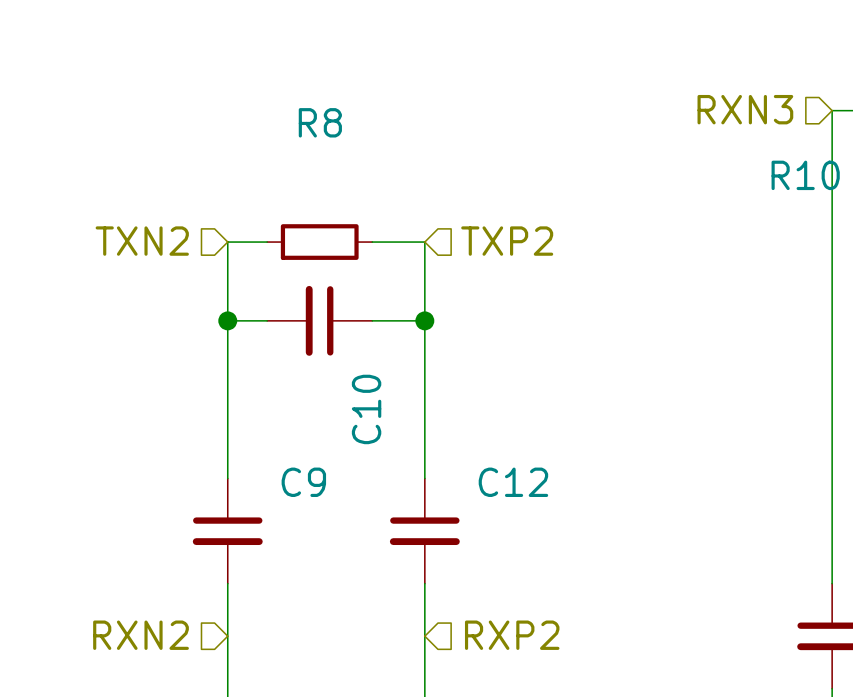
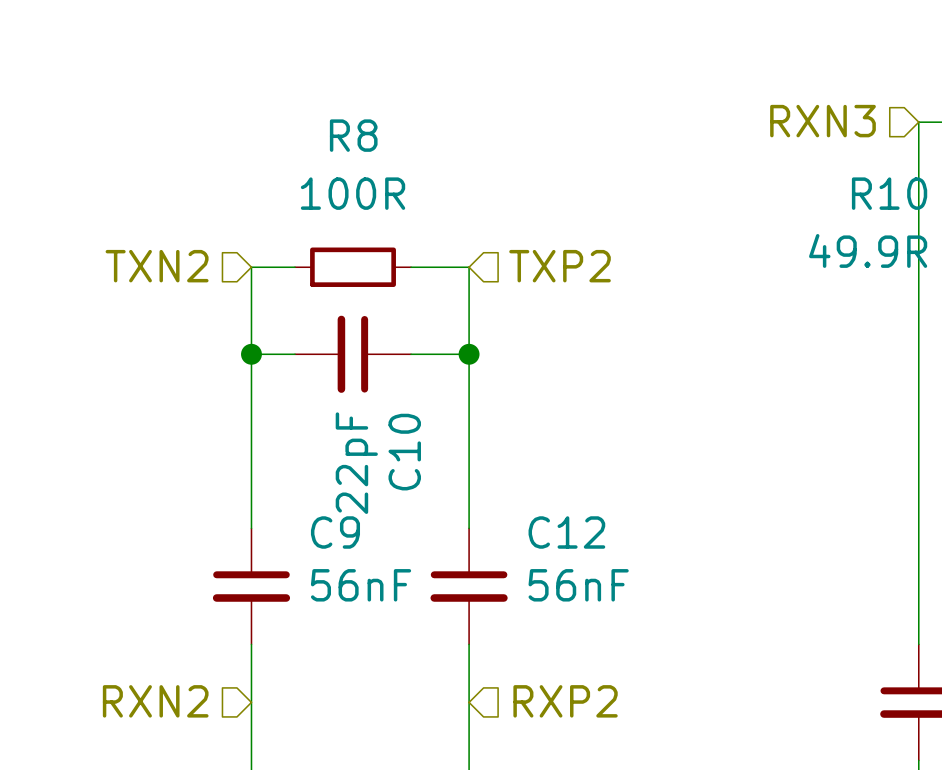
R8 value: none -> 100R (353, 193)
R10 value: none -> 49.9R (868, 250)
C10 value: none -> 22pF (356, 463)
C9 value: none -> 56nF (361, 585)
C12 value: none -> 56nF (578, 585)

